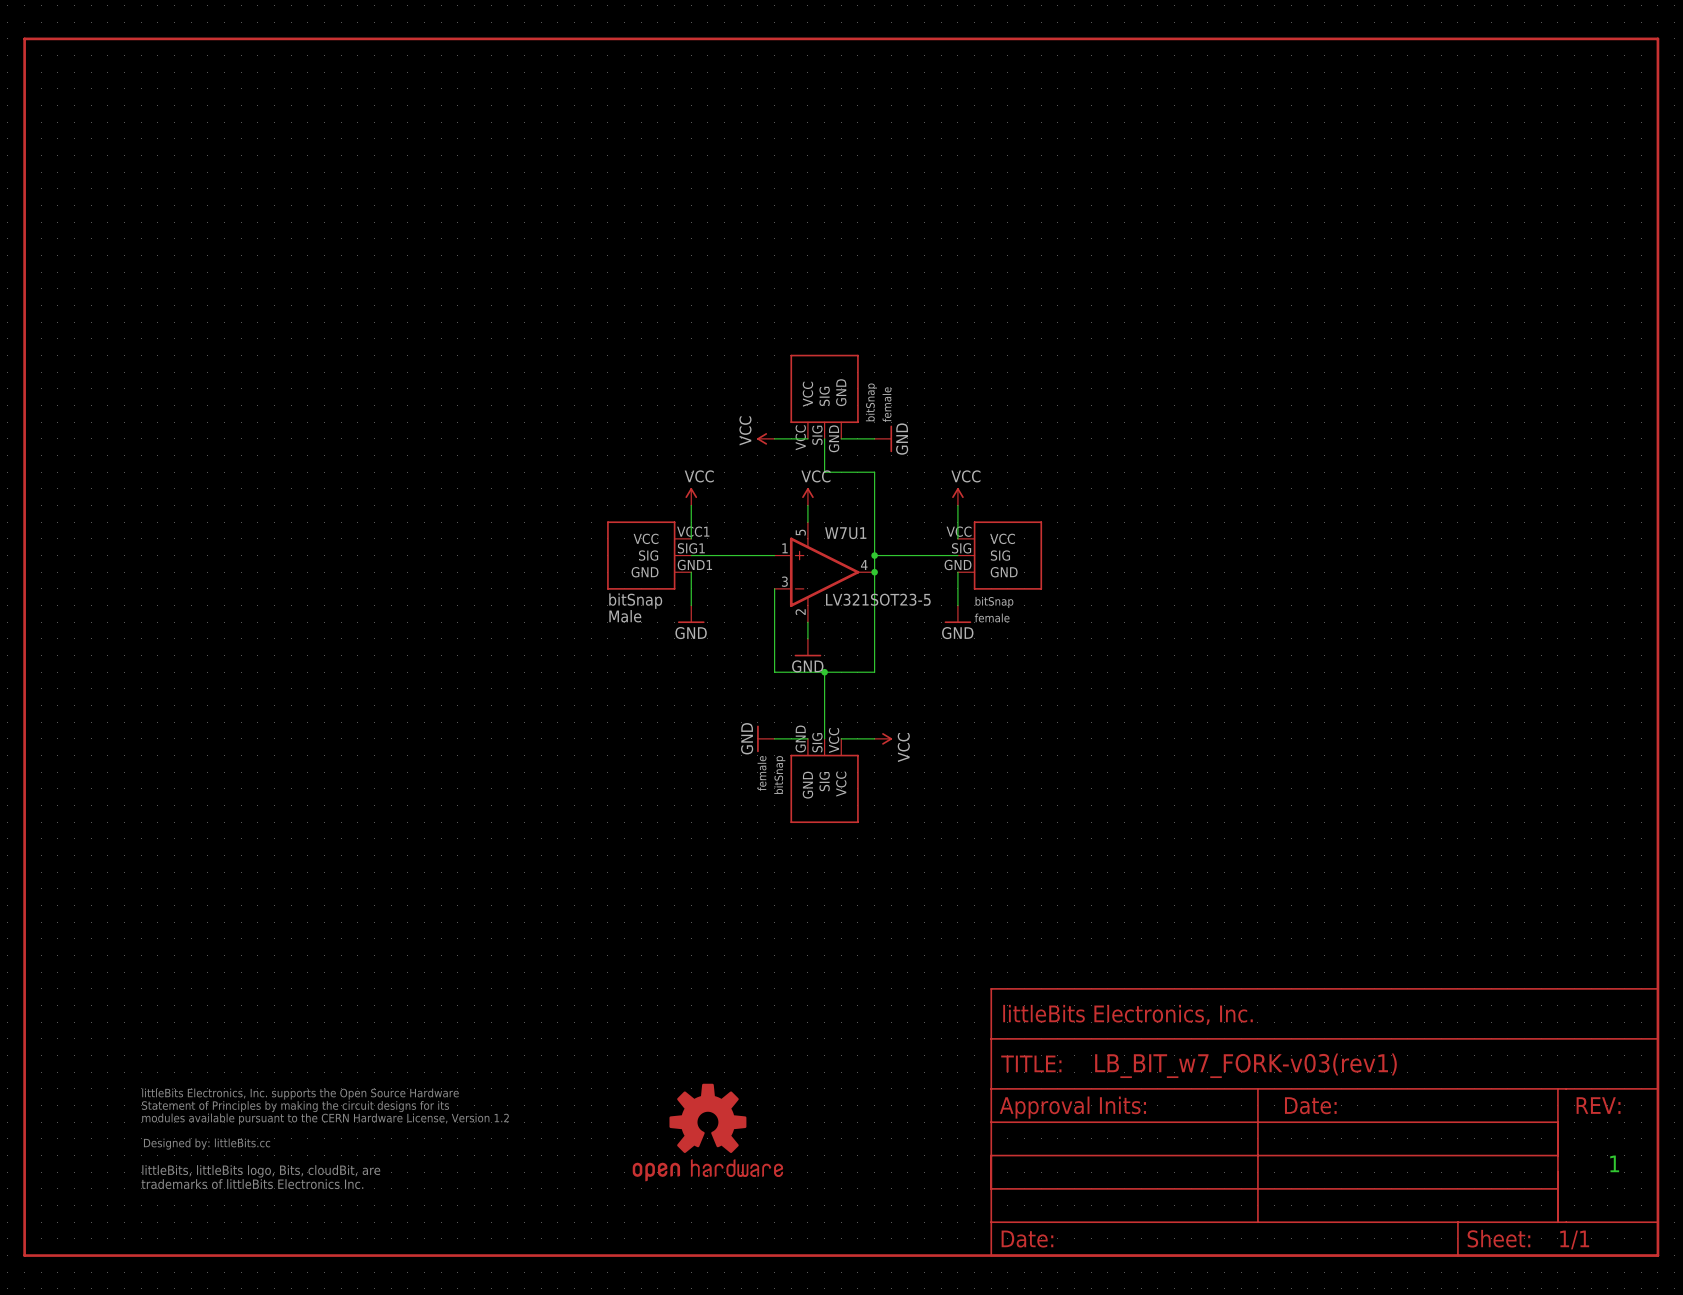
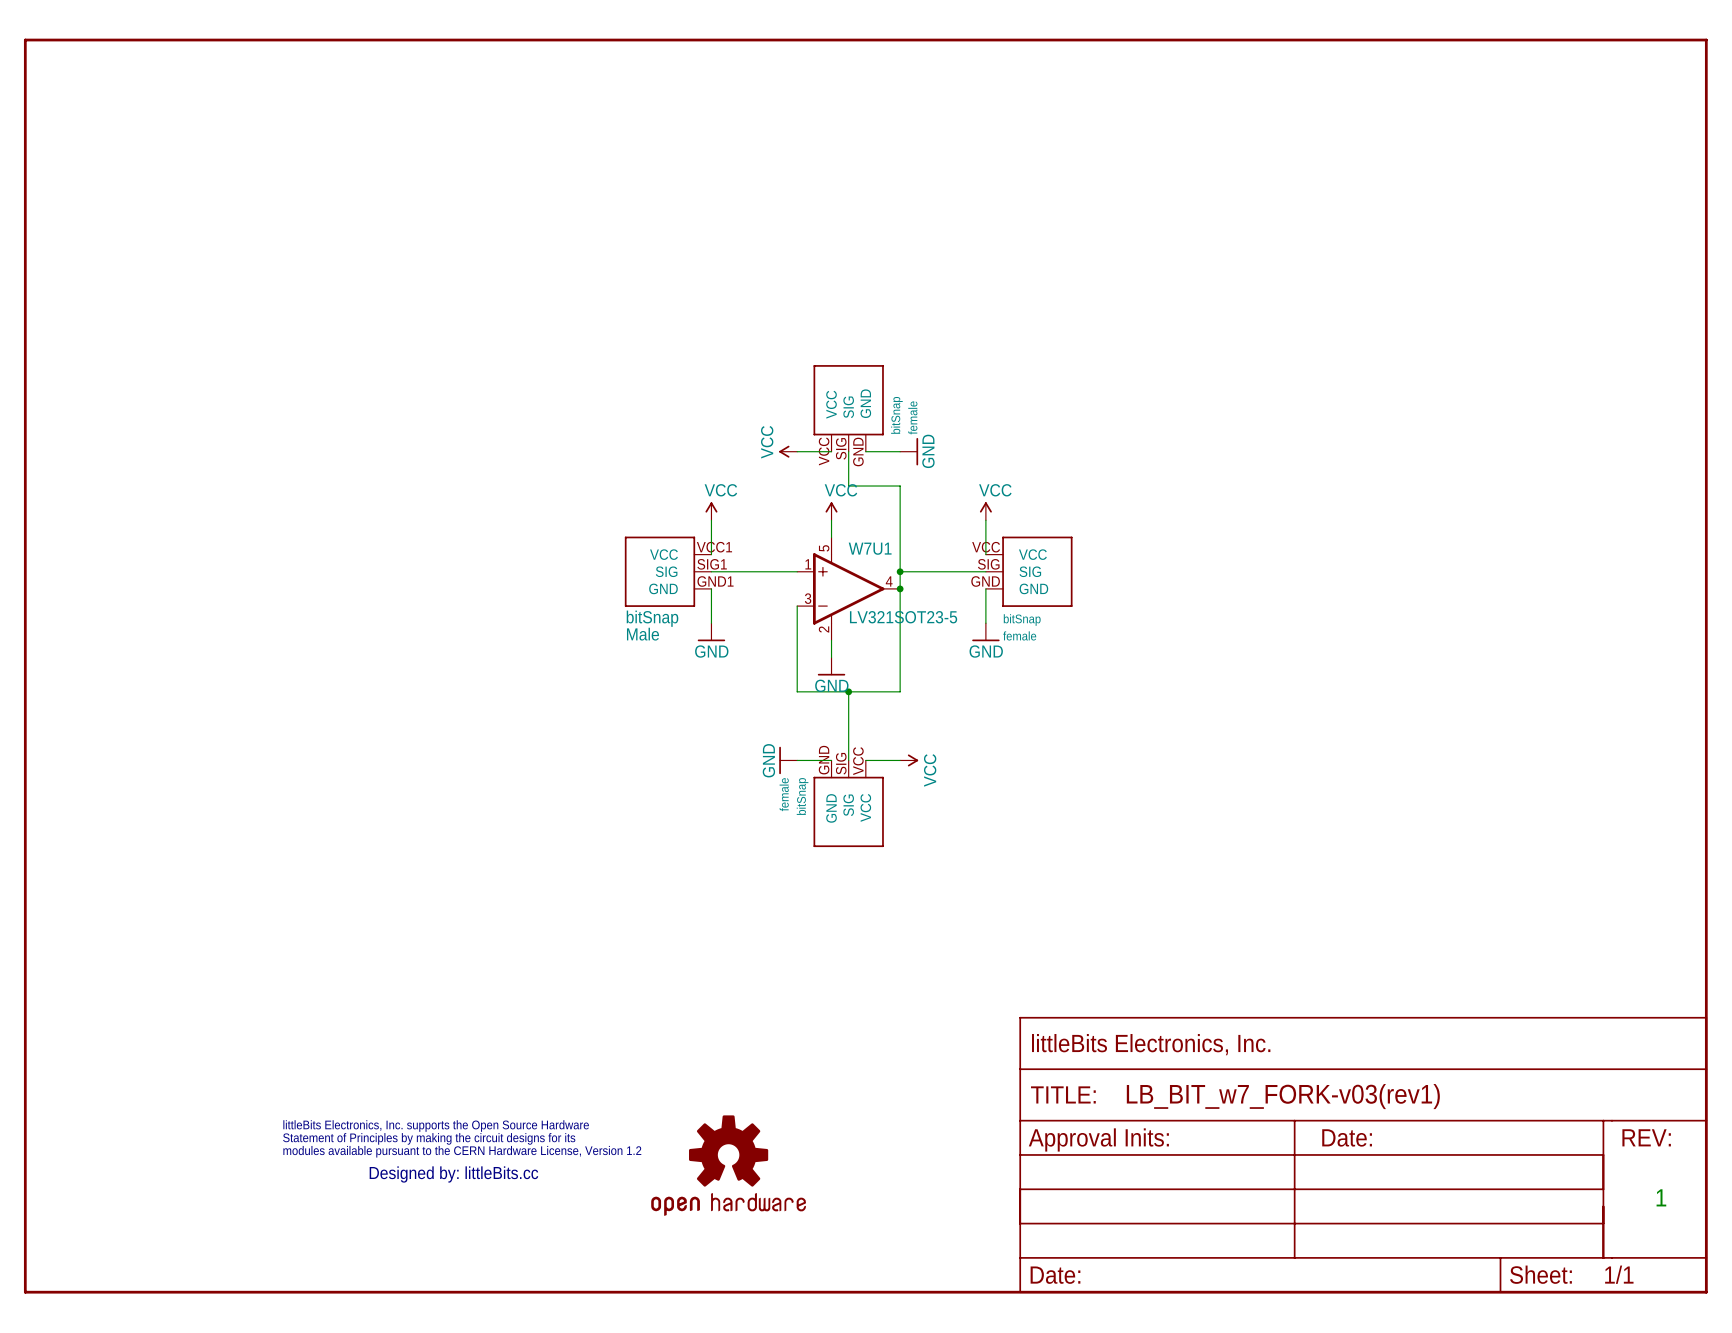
part: none -> (462, 1151)
part: (325, 1138) -> none

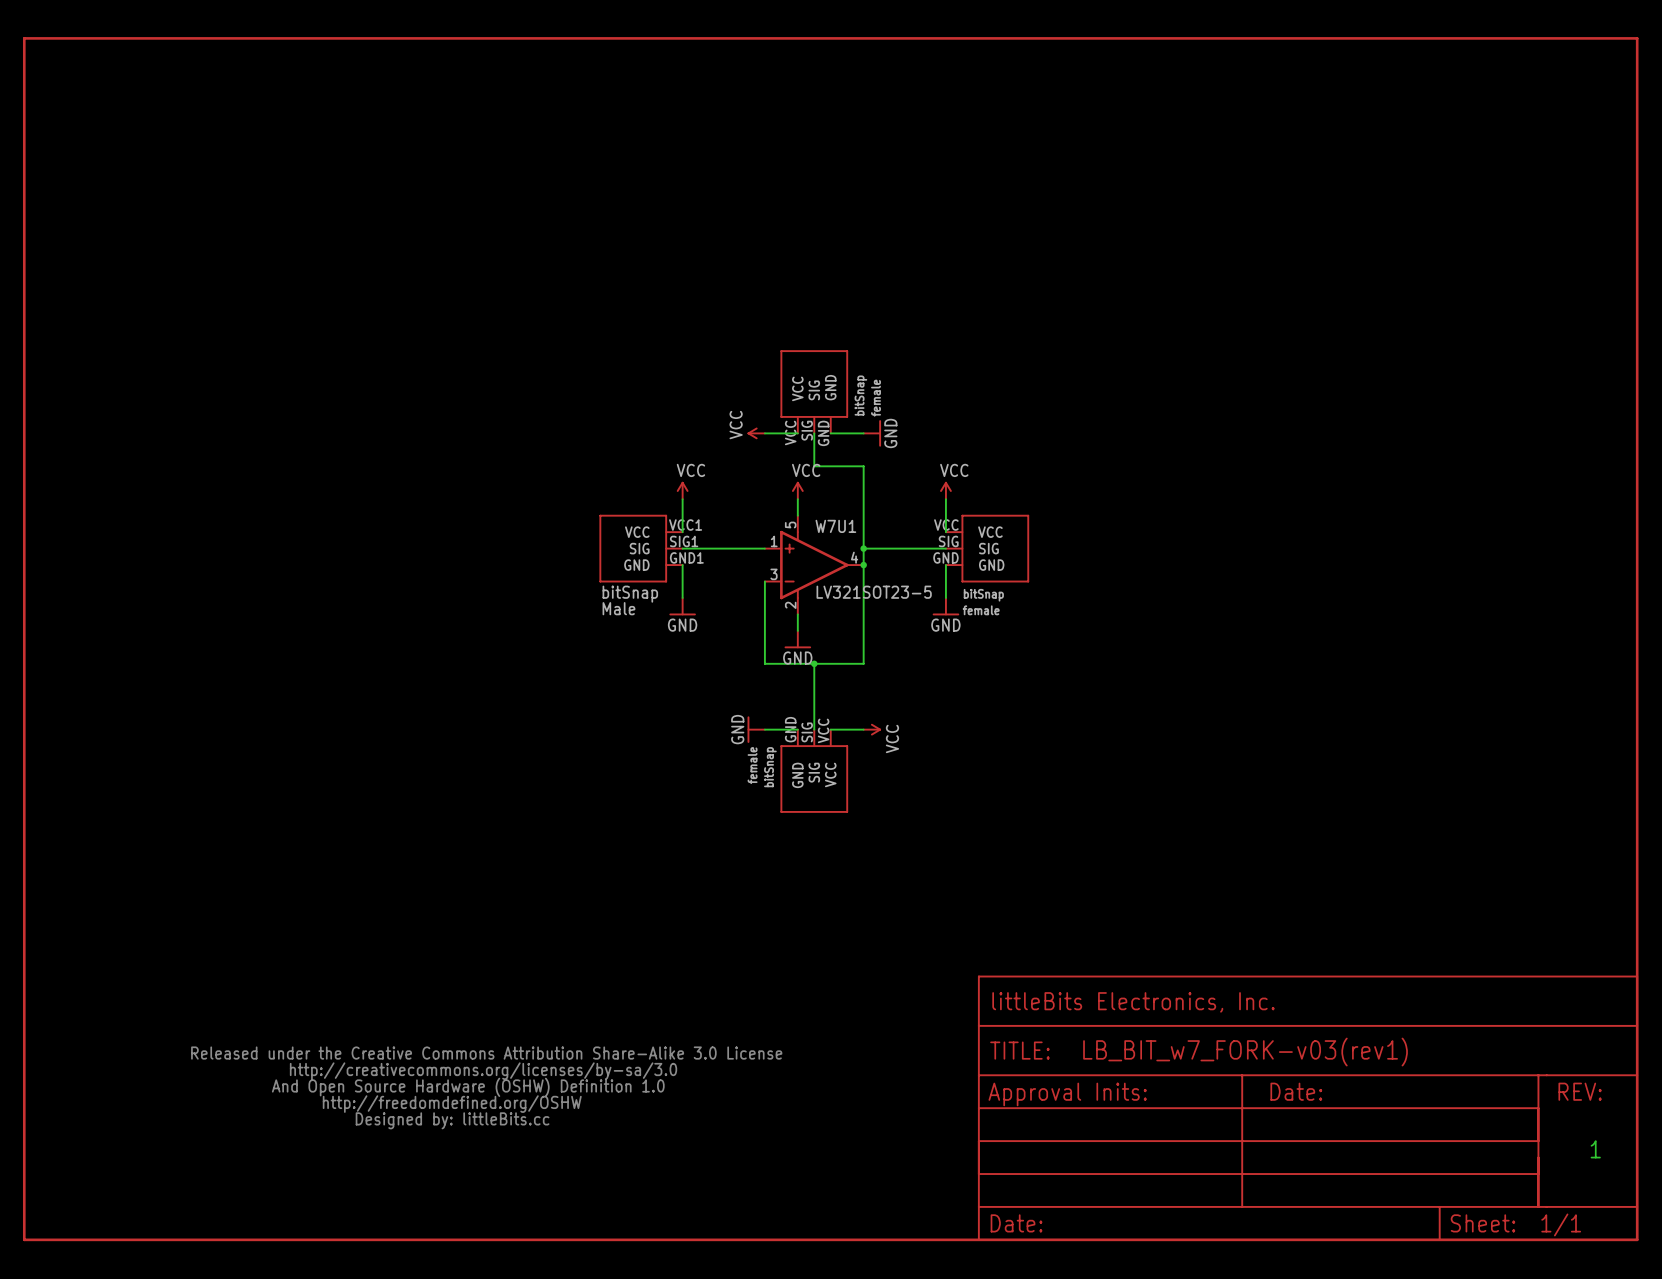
part: none -> (486, 1087)
part: (462, 1151) -> none
part: (728, 1165) -> none

